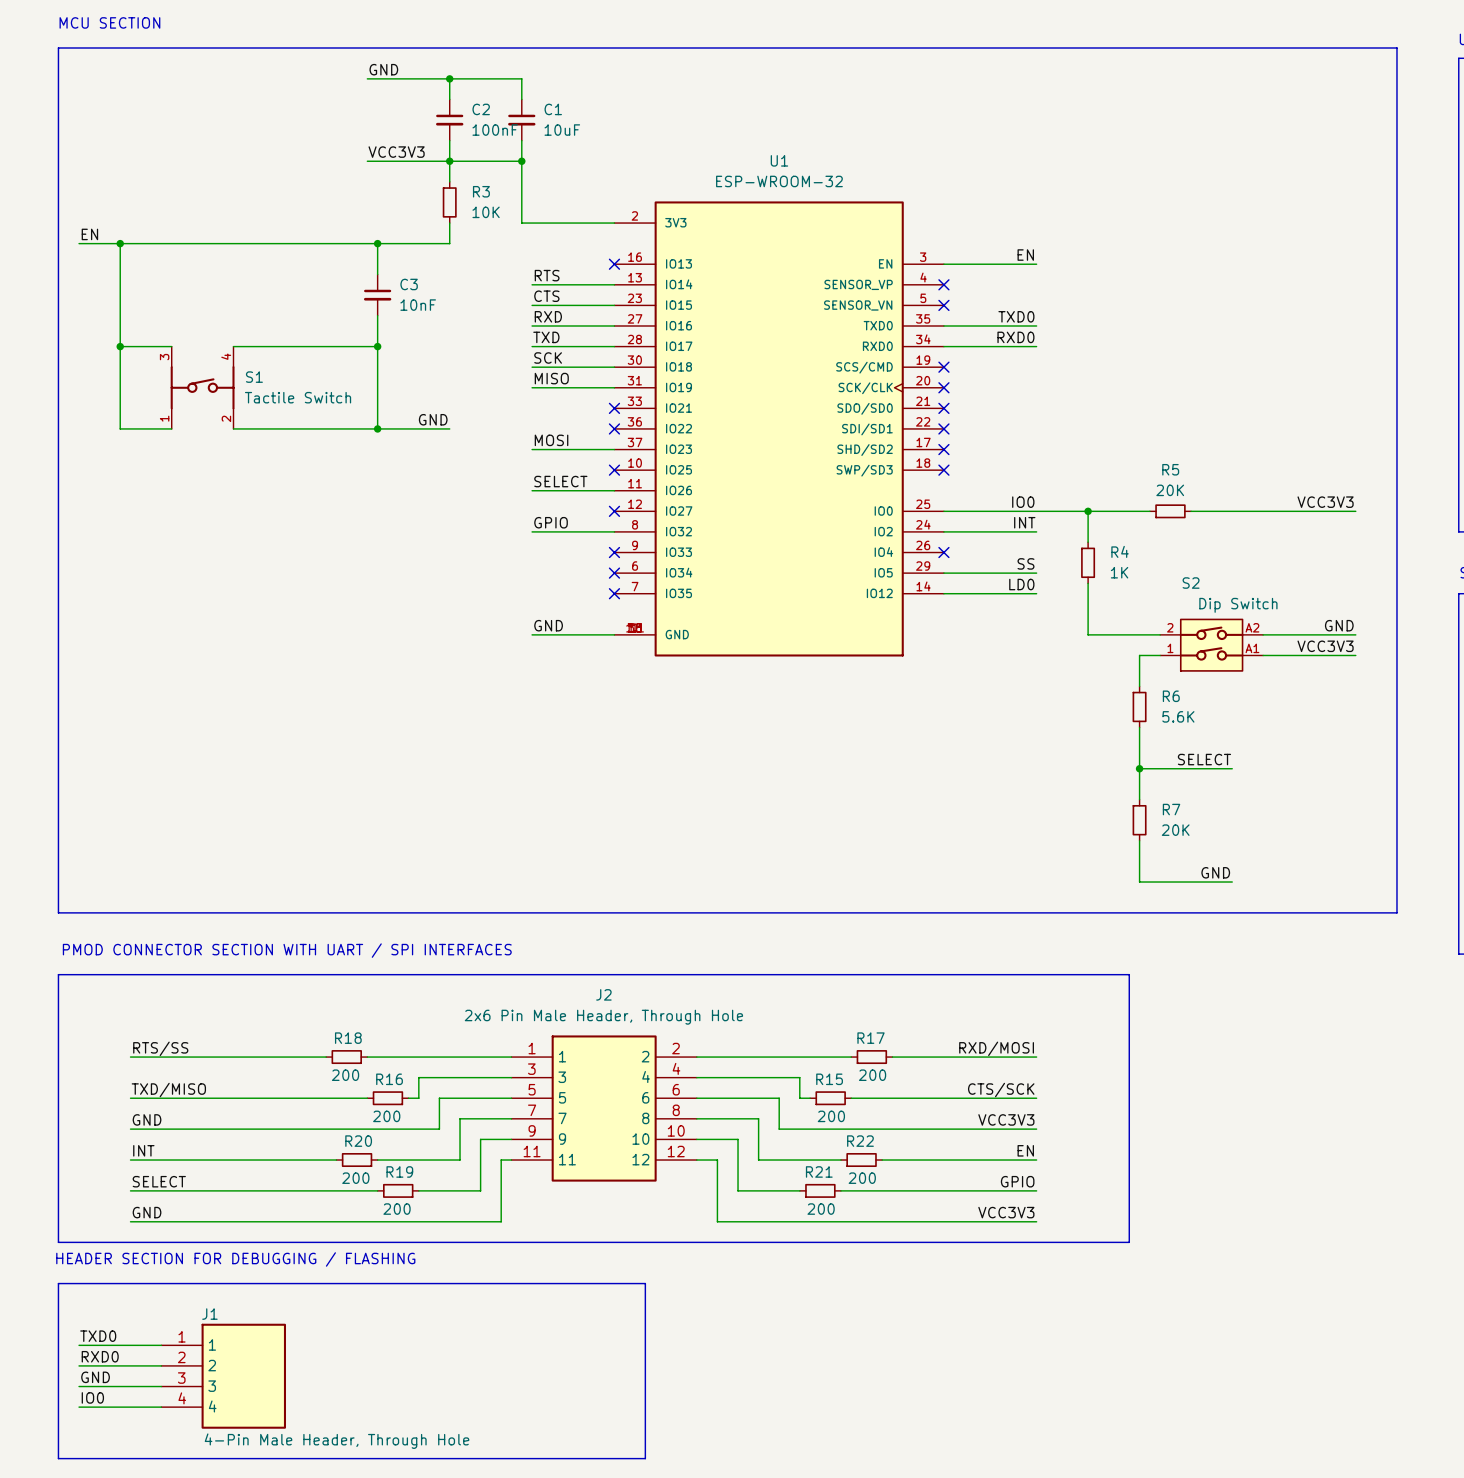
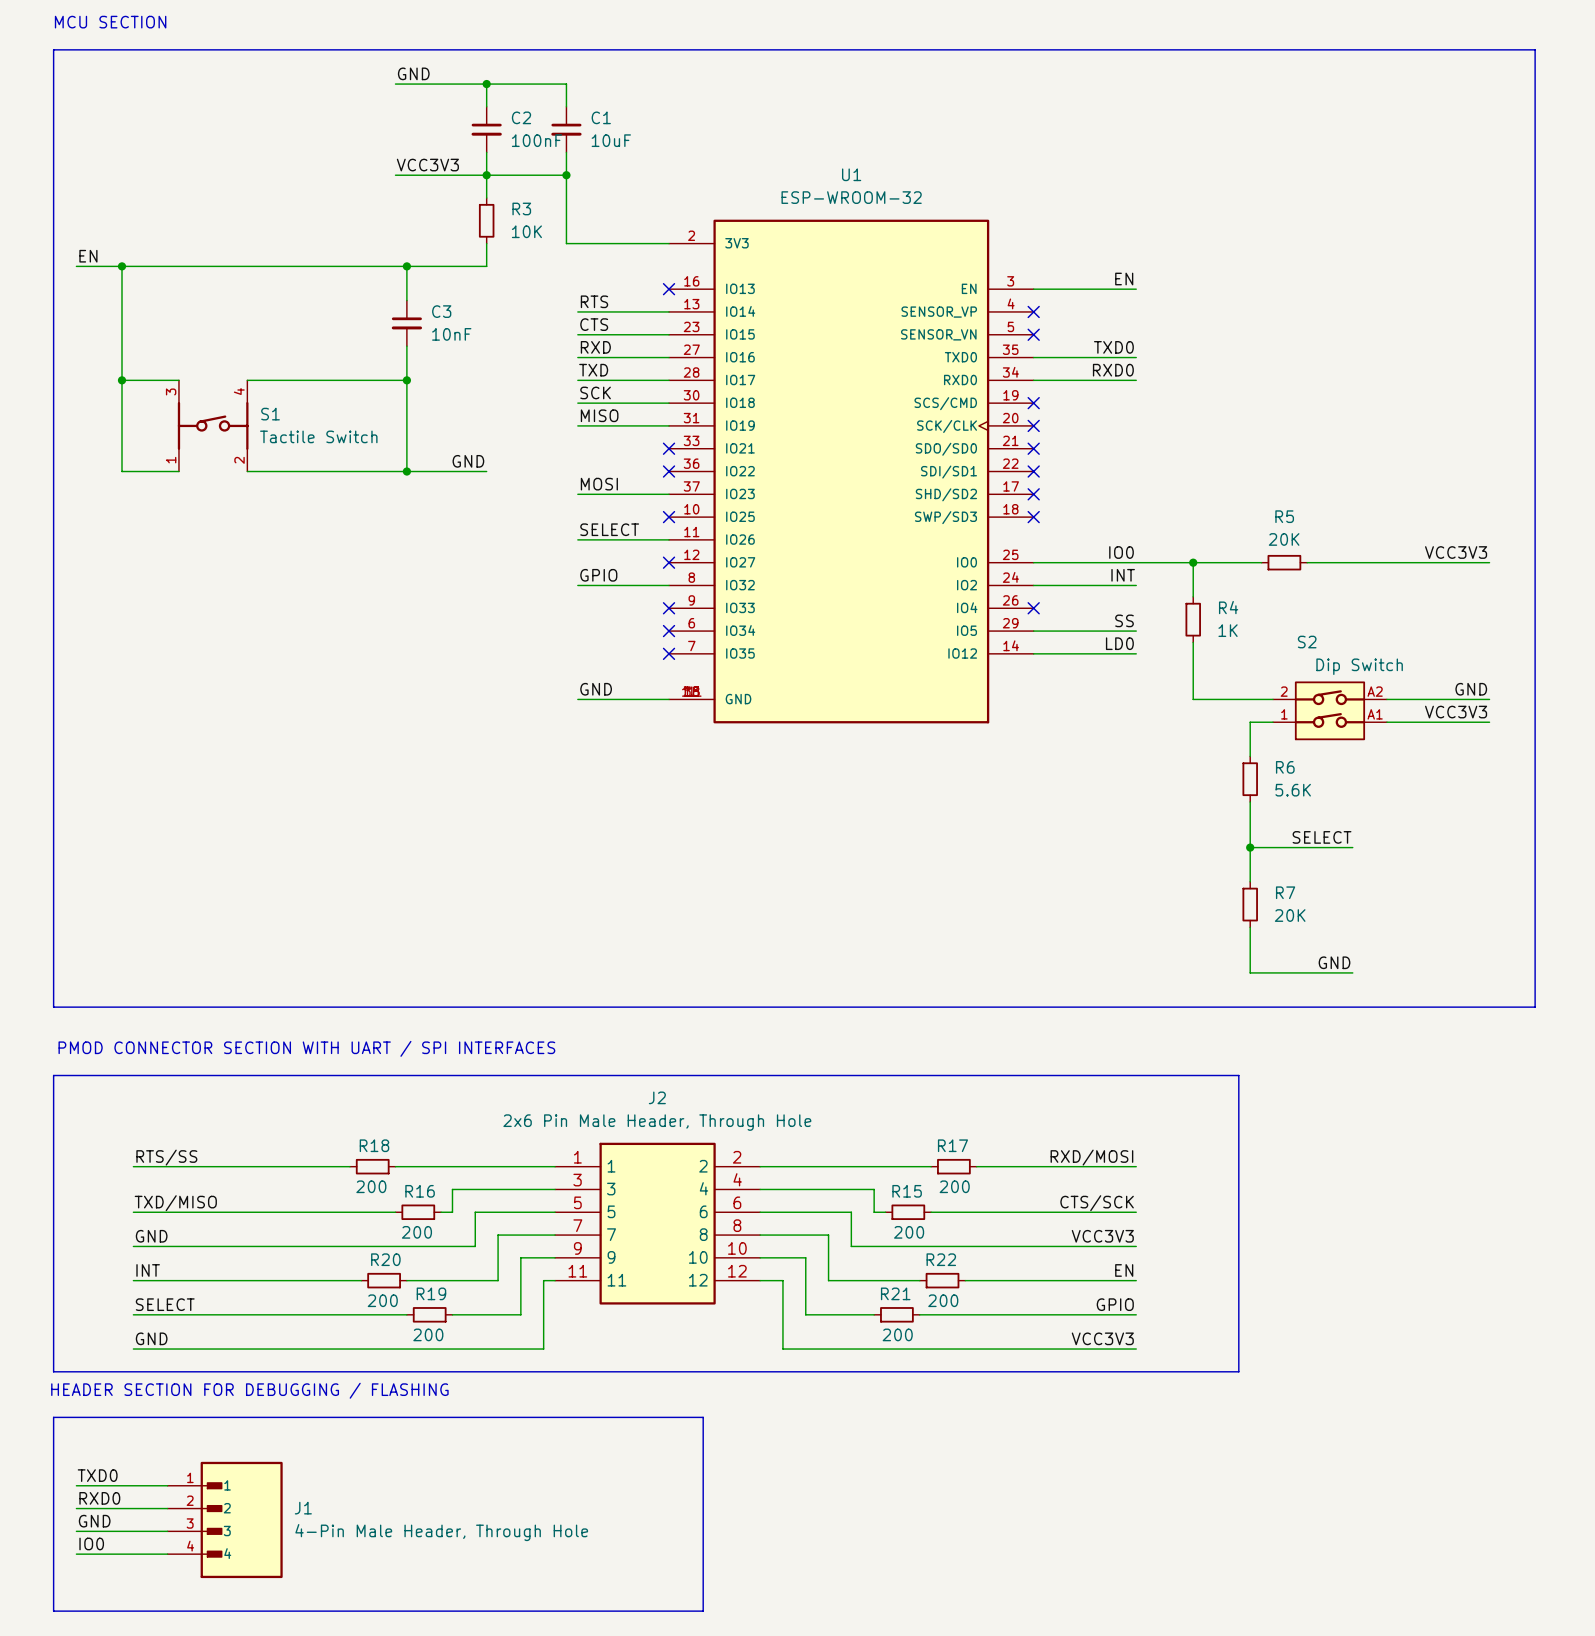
J1 name position: J1 (209, 1314) -> J1 (303, 1508)
J1 symbol: [161, 1323, 287, 1429] -> [167, 1461, 283, 1579]
J1 value position: 4-Pin Male Header, Through Hole (337, 1441) -> 4-Pin Male Header, Through Hole (441, 1532)

